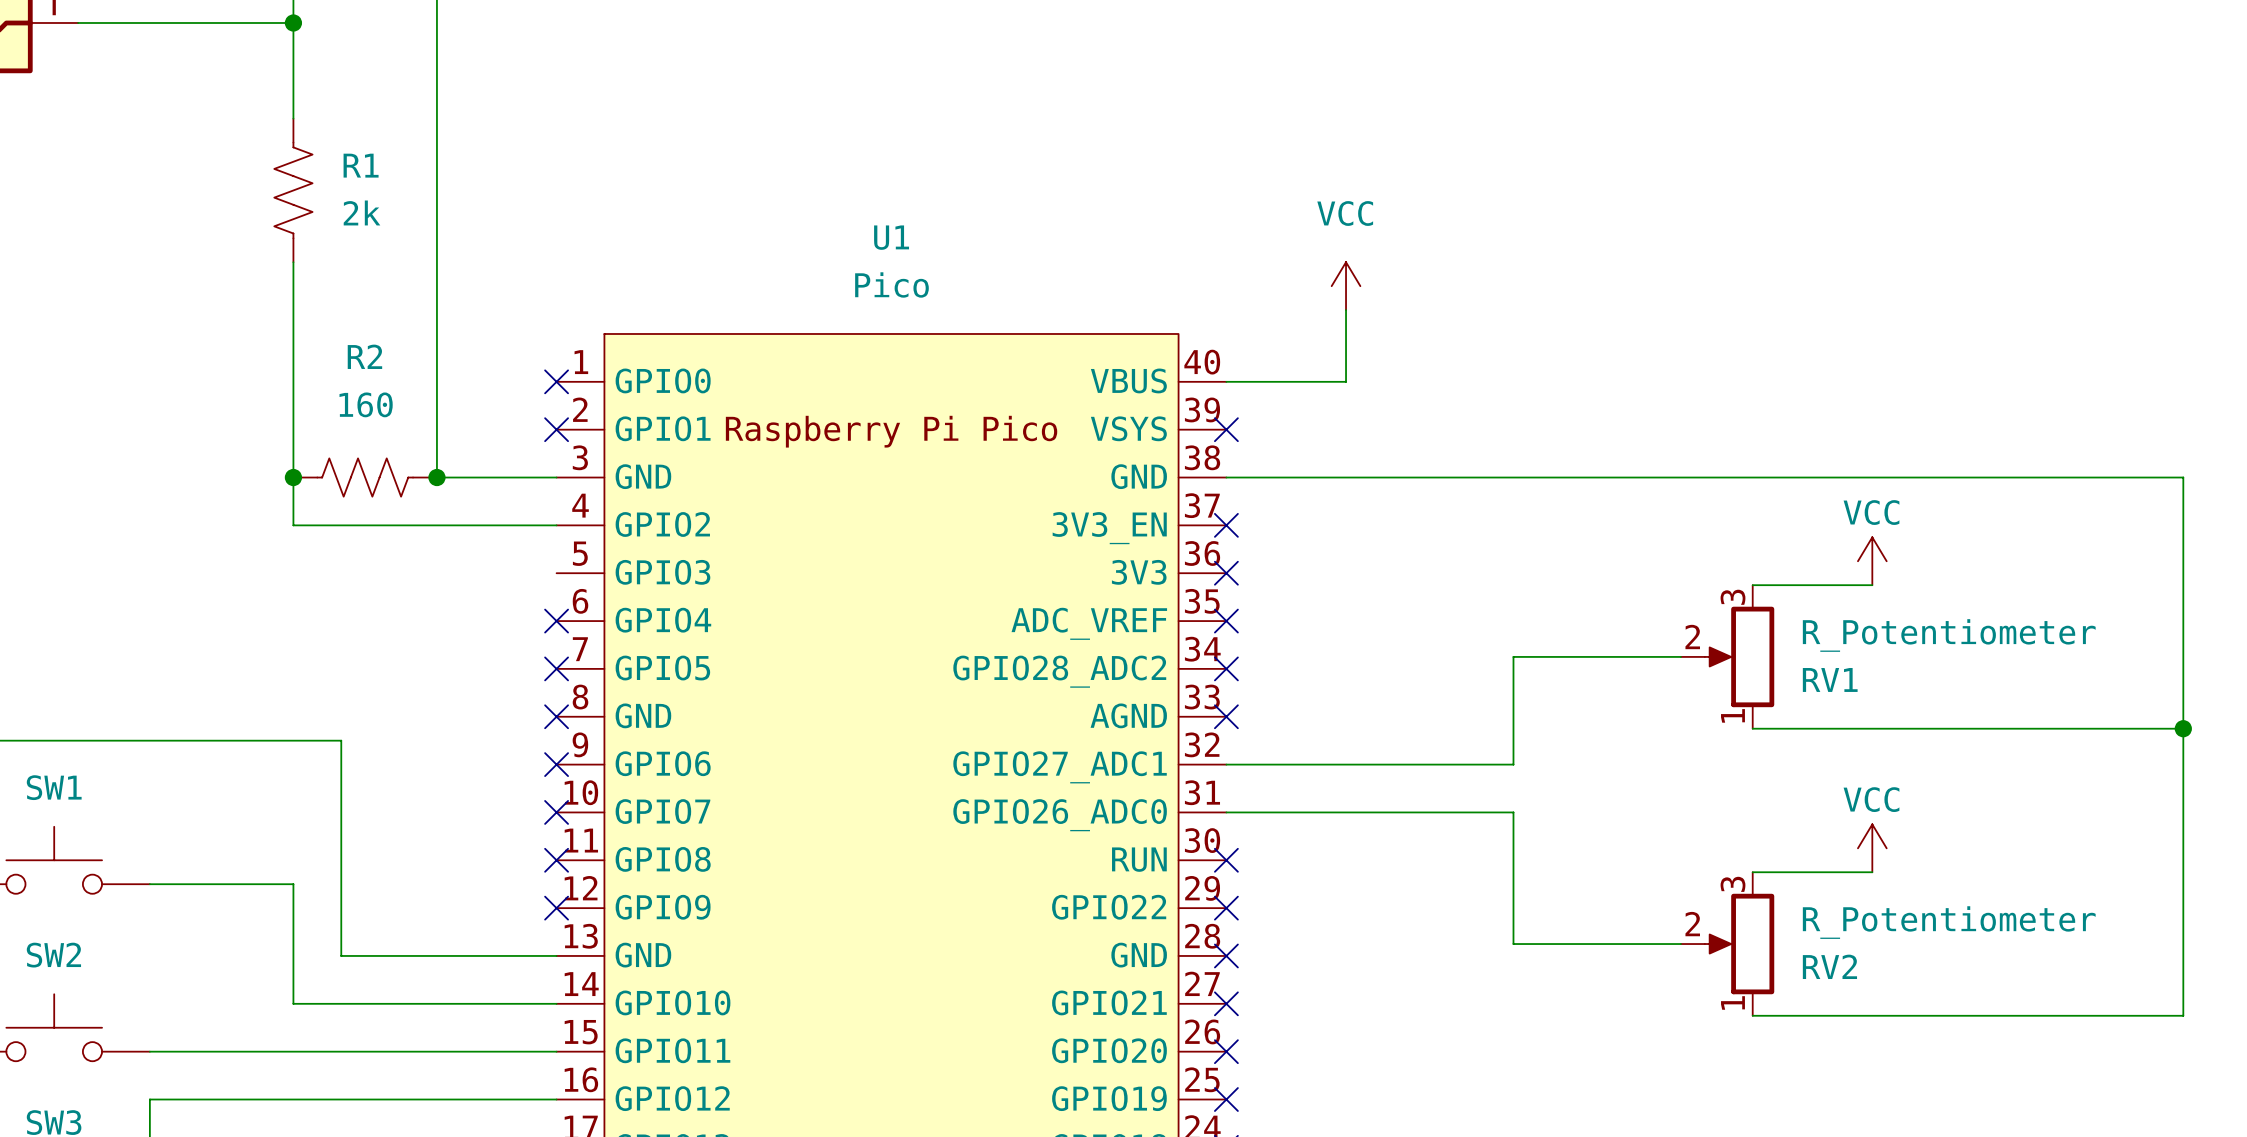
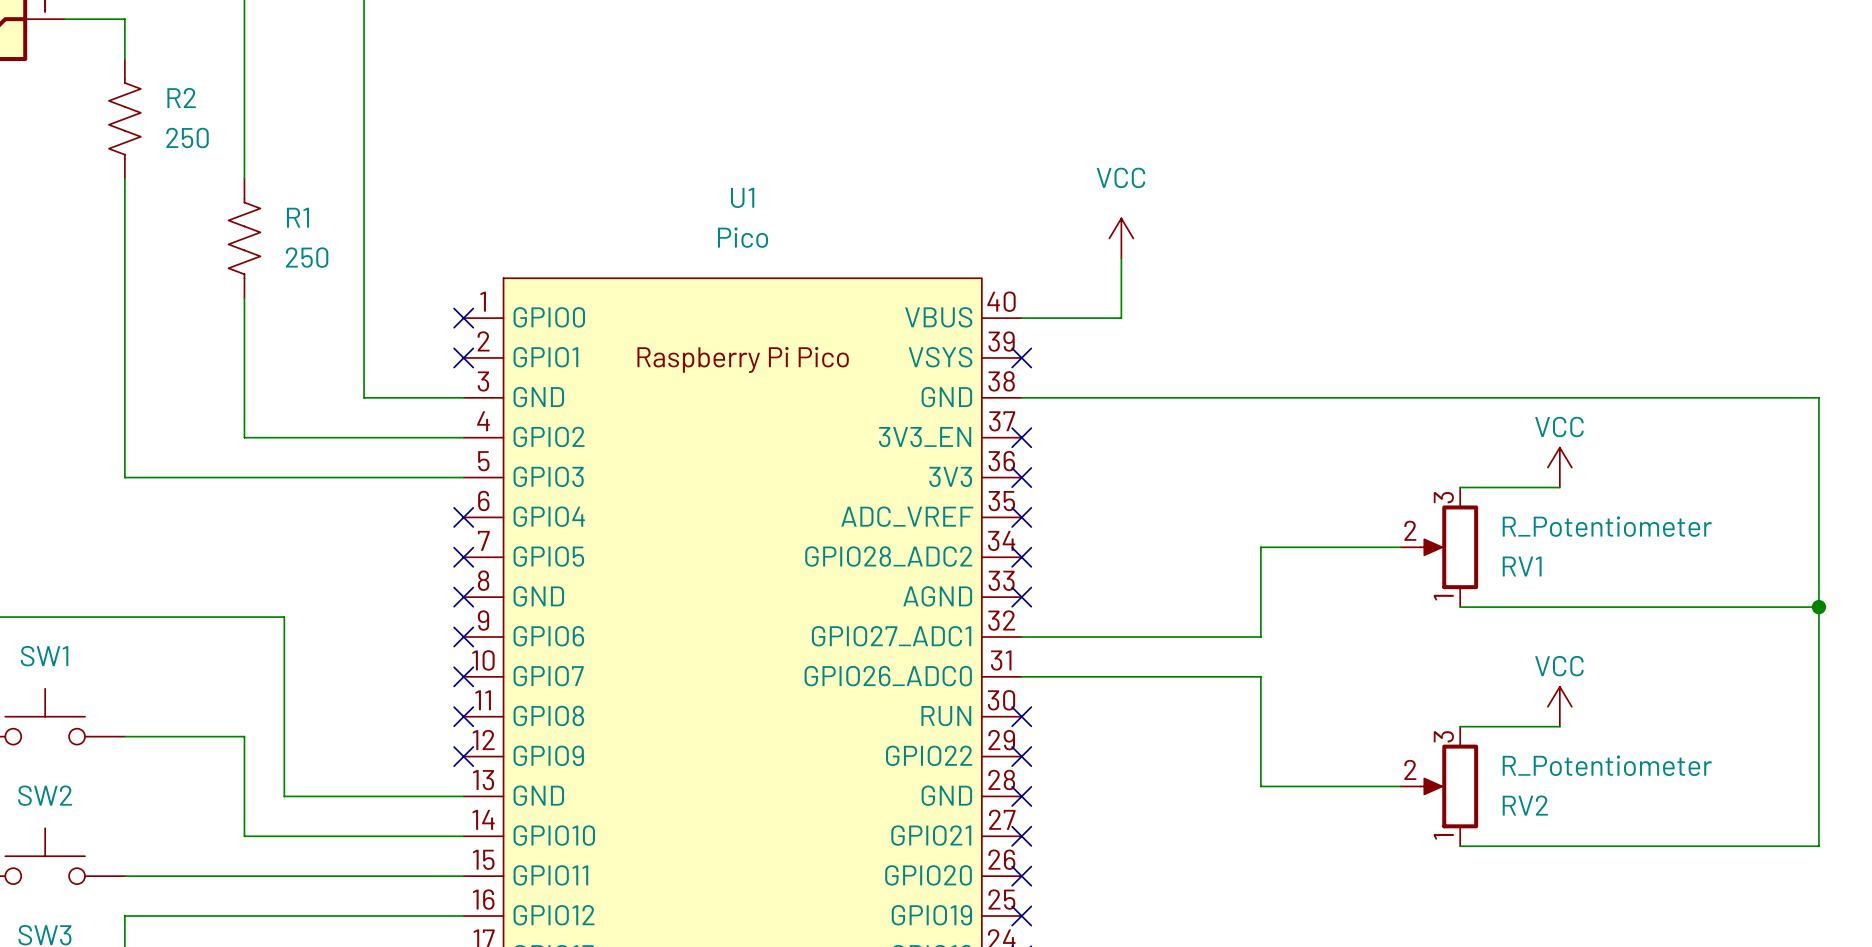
wire: (149, 22) (293, 22) -> (124, 19) (124, 59)
junction: (293, 22) -> none
R1 position: (293, 190) -> (244, 238)
R1 value: 2k (362, 212) -> 250 (307, 257)
wire: none -> (124, 178) (124, 477) (463, 477)
wire: (293, 262) (293, 357) -> (244, 98) (244, 178)
R2 name position: R2 (364, 356) -> R2 (181, 98)
R2 value: 160 (366, 404) -> 250 (187, 138)
junction: (293, 477) -> none
R2 rotation: 0° (365, 477) -> 90° clockwise (124, 118)
R2 position: (365, 477) -> (124, 118)
junction: (436, 477) -> none

